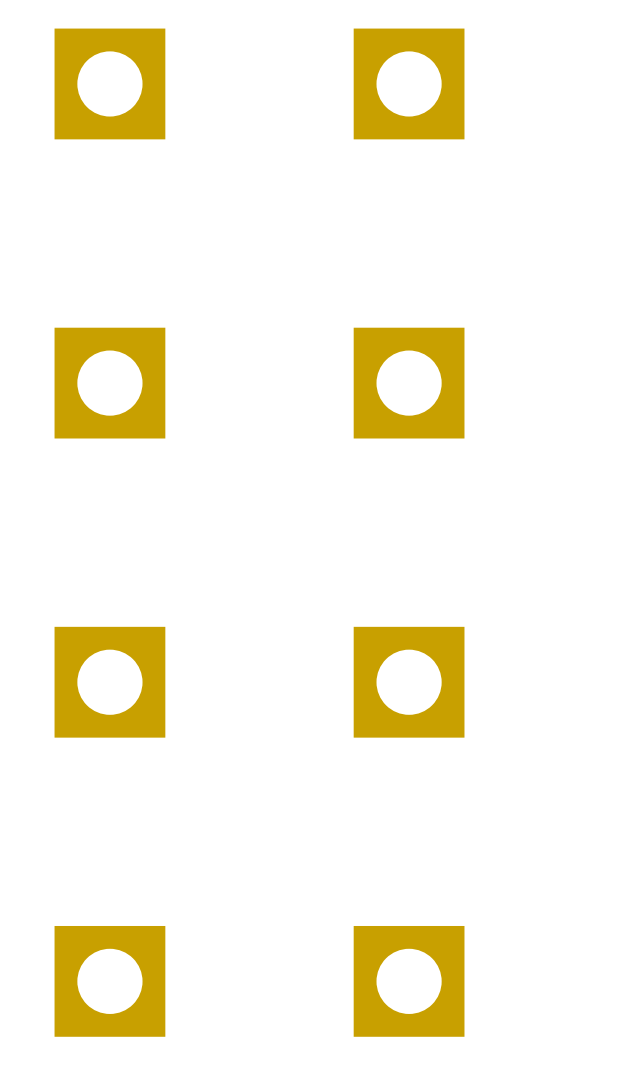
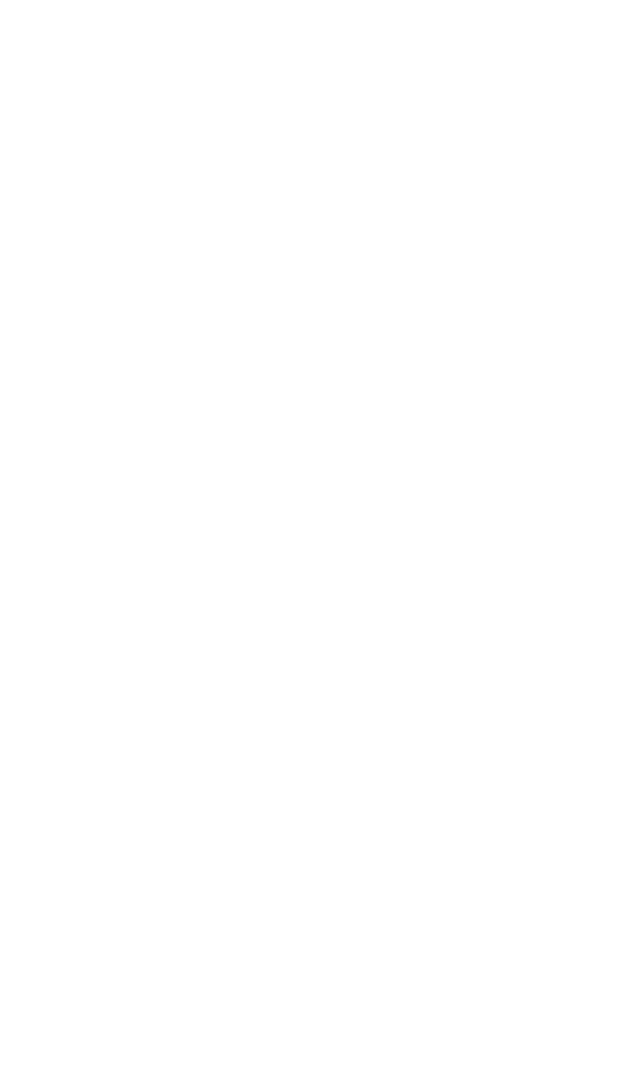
part: (109, 83) -> none
part: (409, 83) -> none
part: (109, 383) -> none
part: (409, 383) -> none
part: (109, 682) -> none
part: (409, 682) -> none
part: (109, 981) -> none
part: (409, 981) -> none

